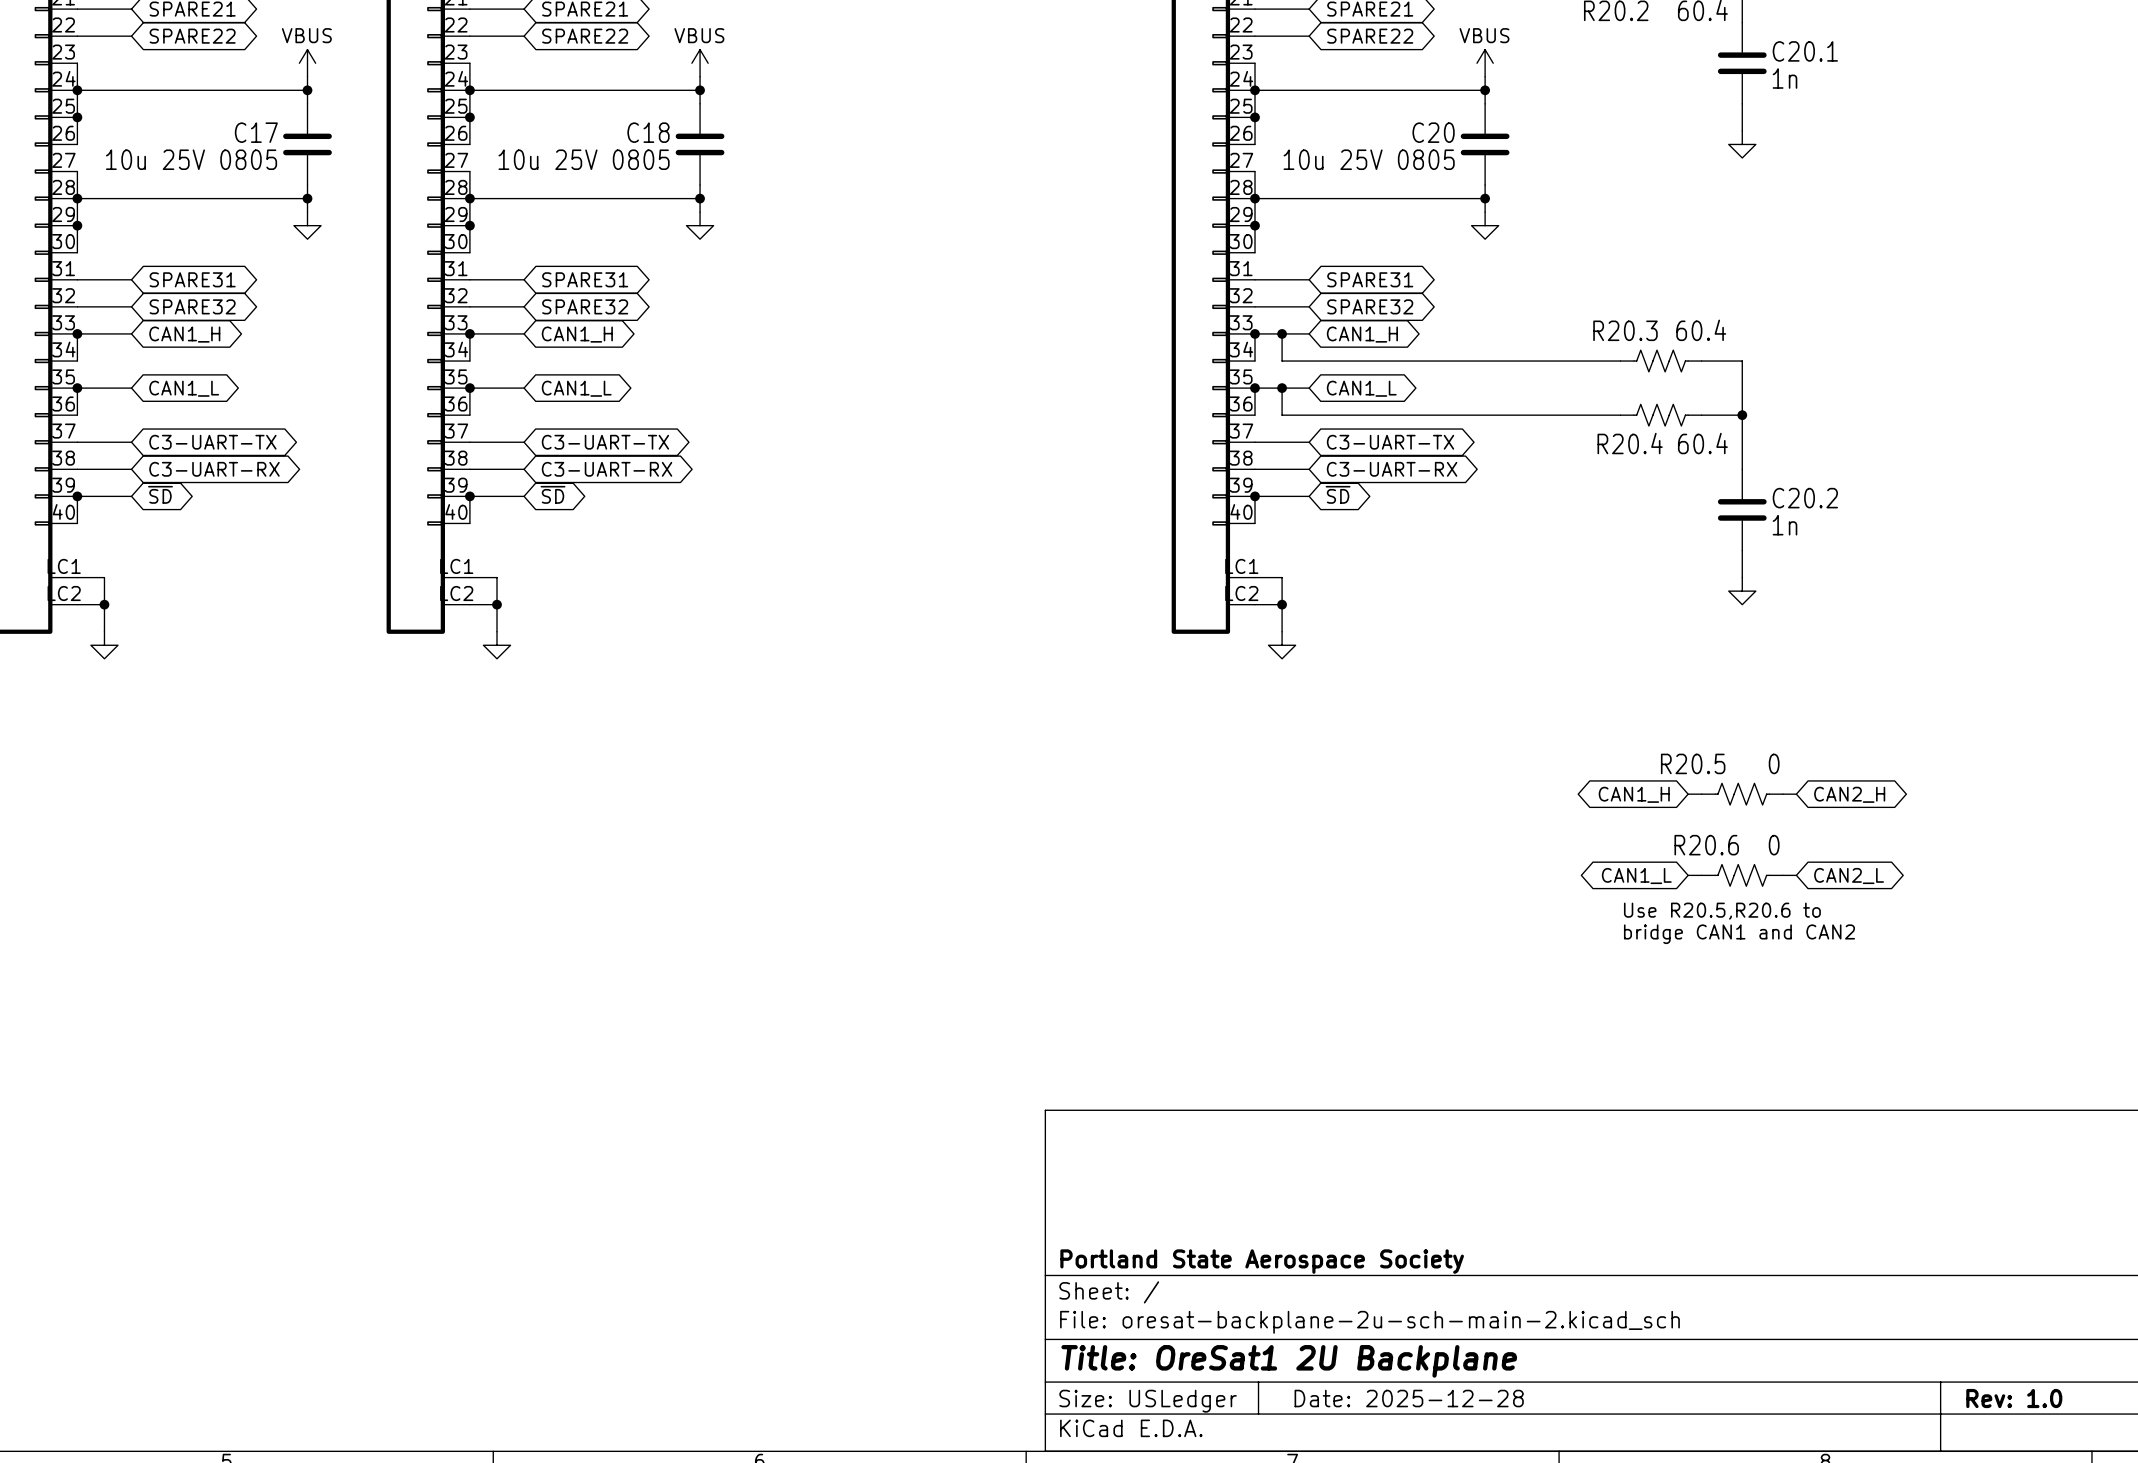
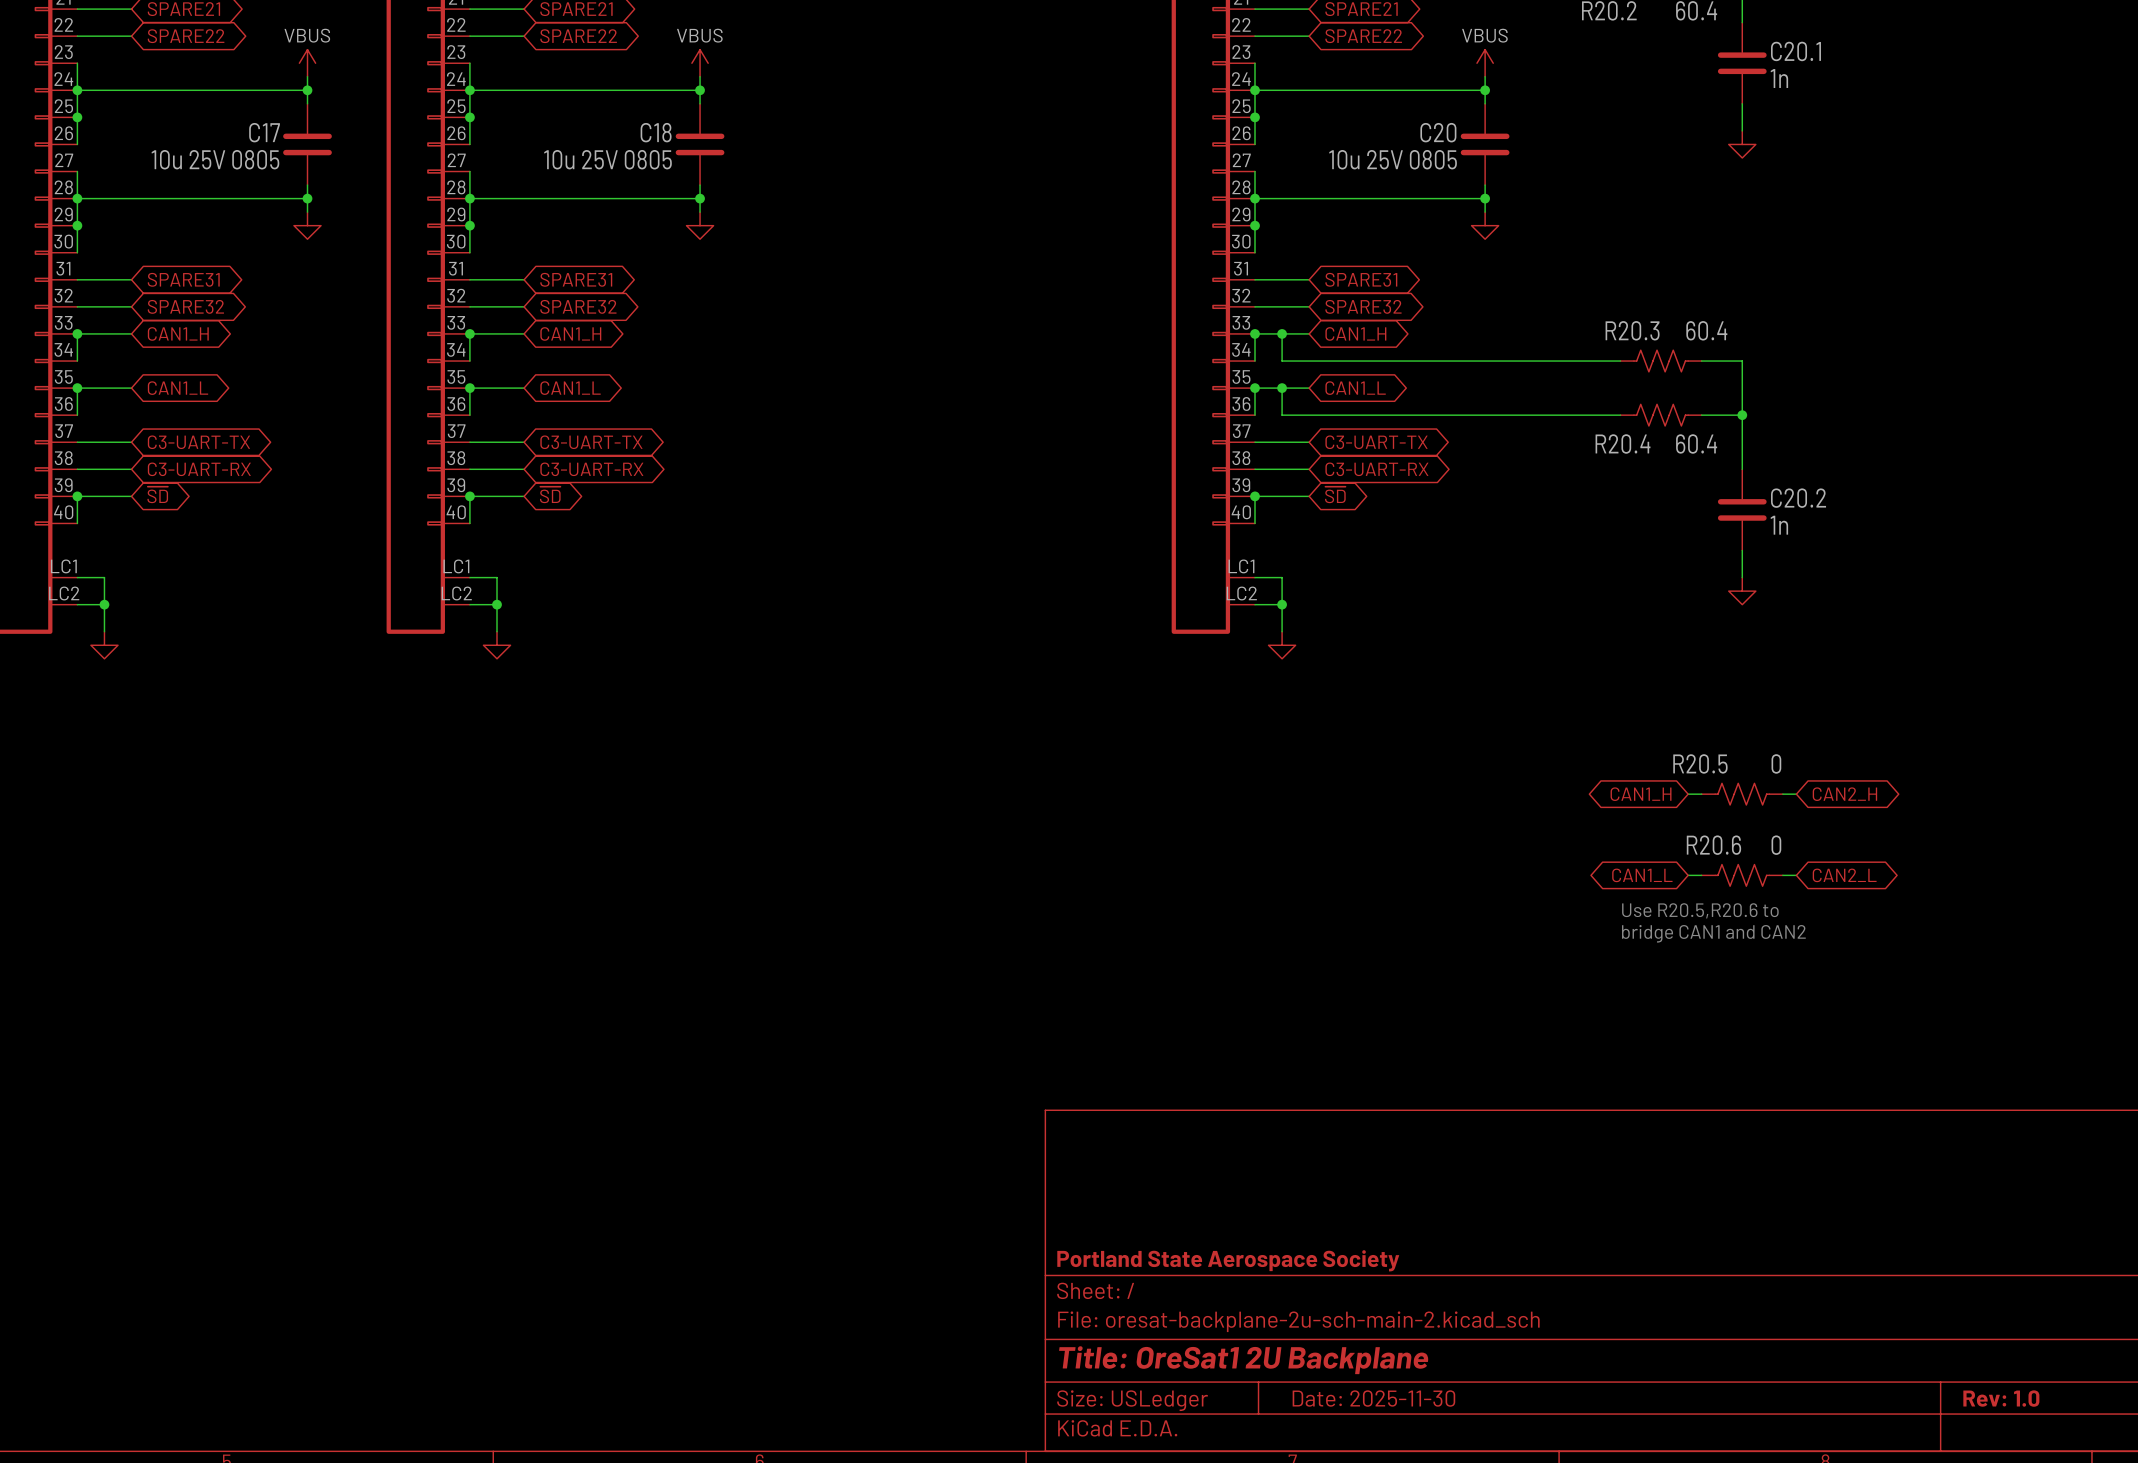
title block: Date: 2025-12-28 (1409, 1398) -> Date: 2025-11-30 (1373, 1398)

